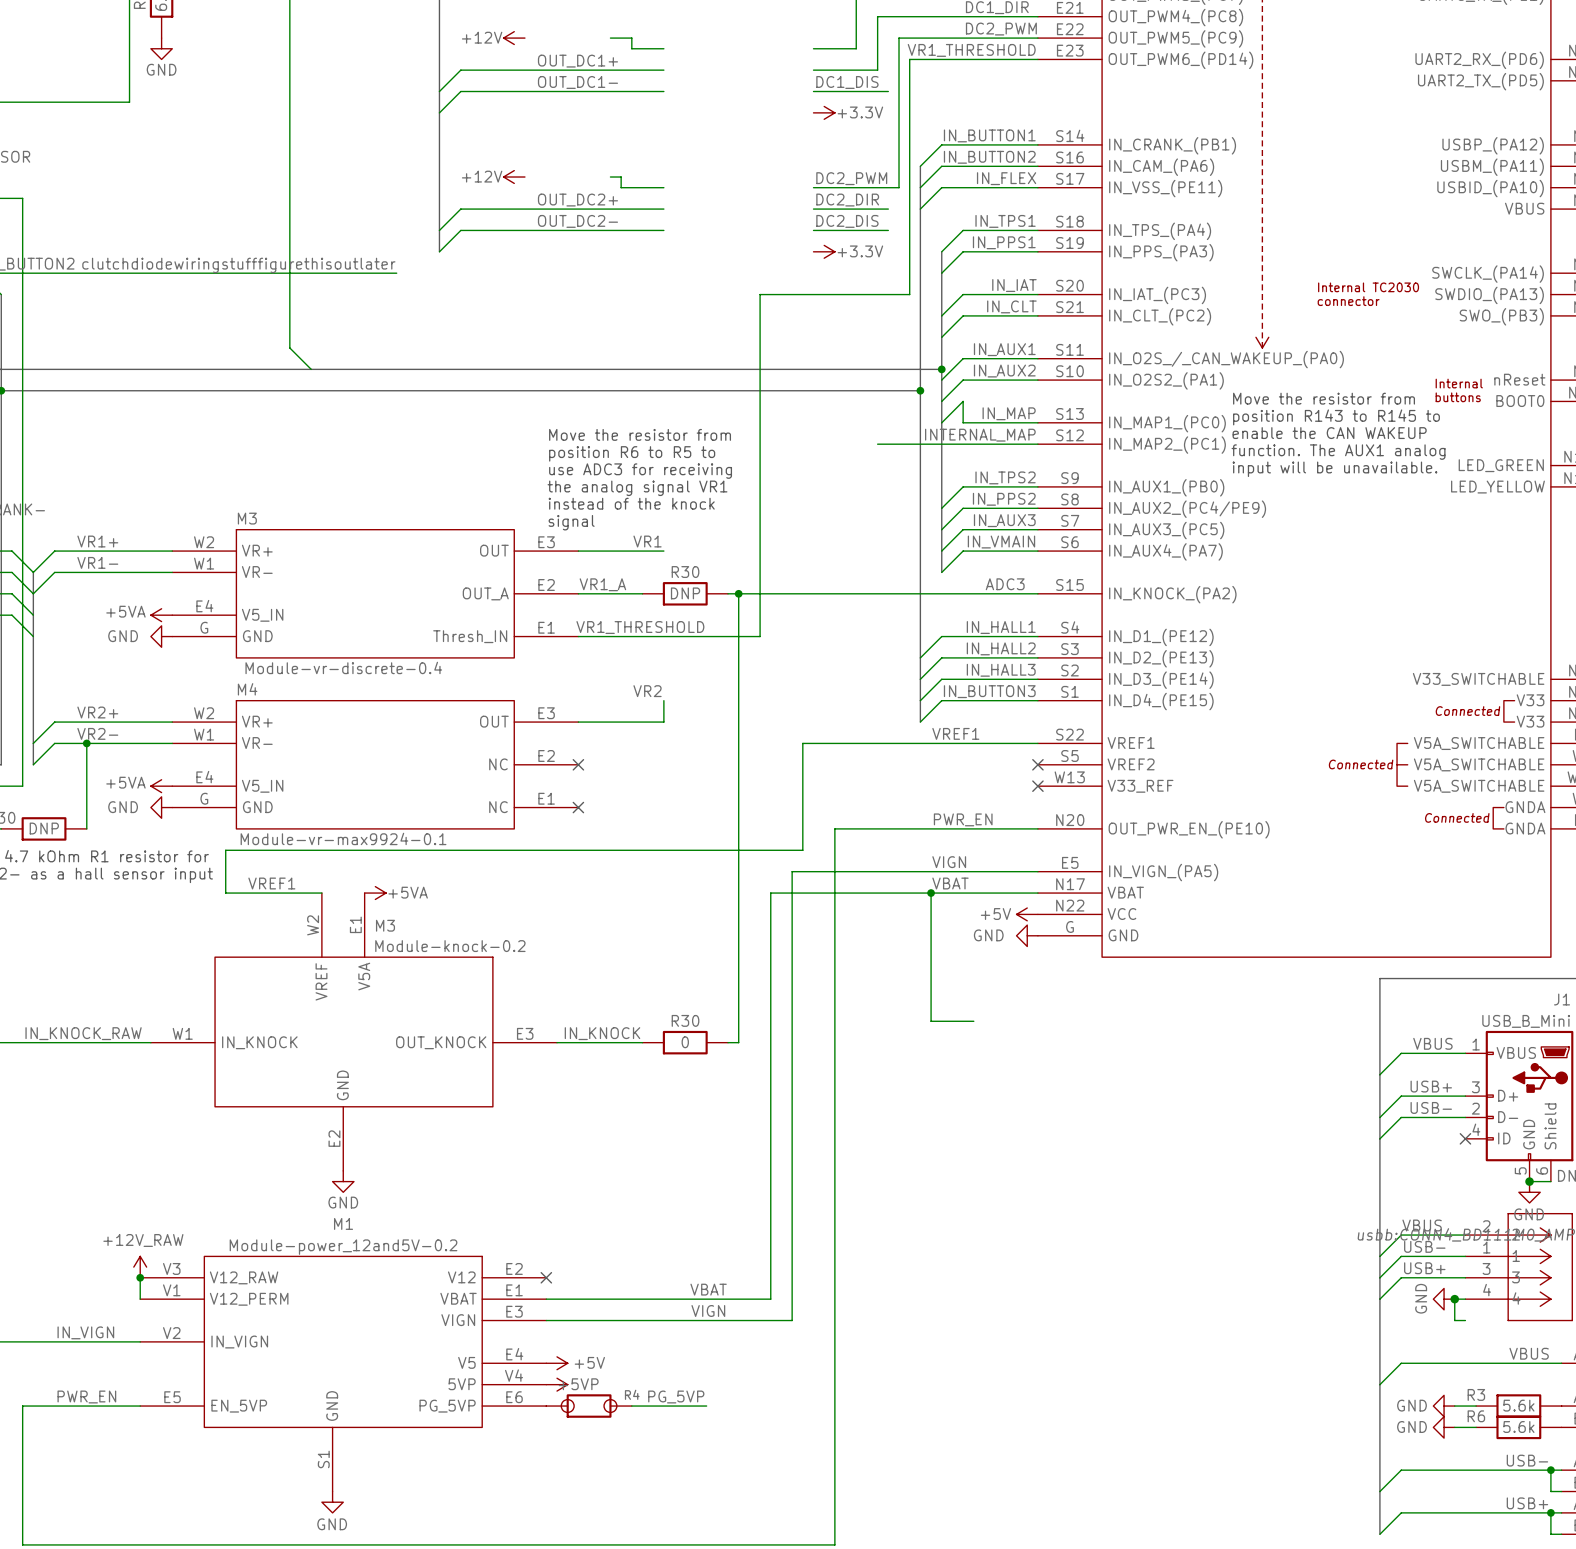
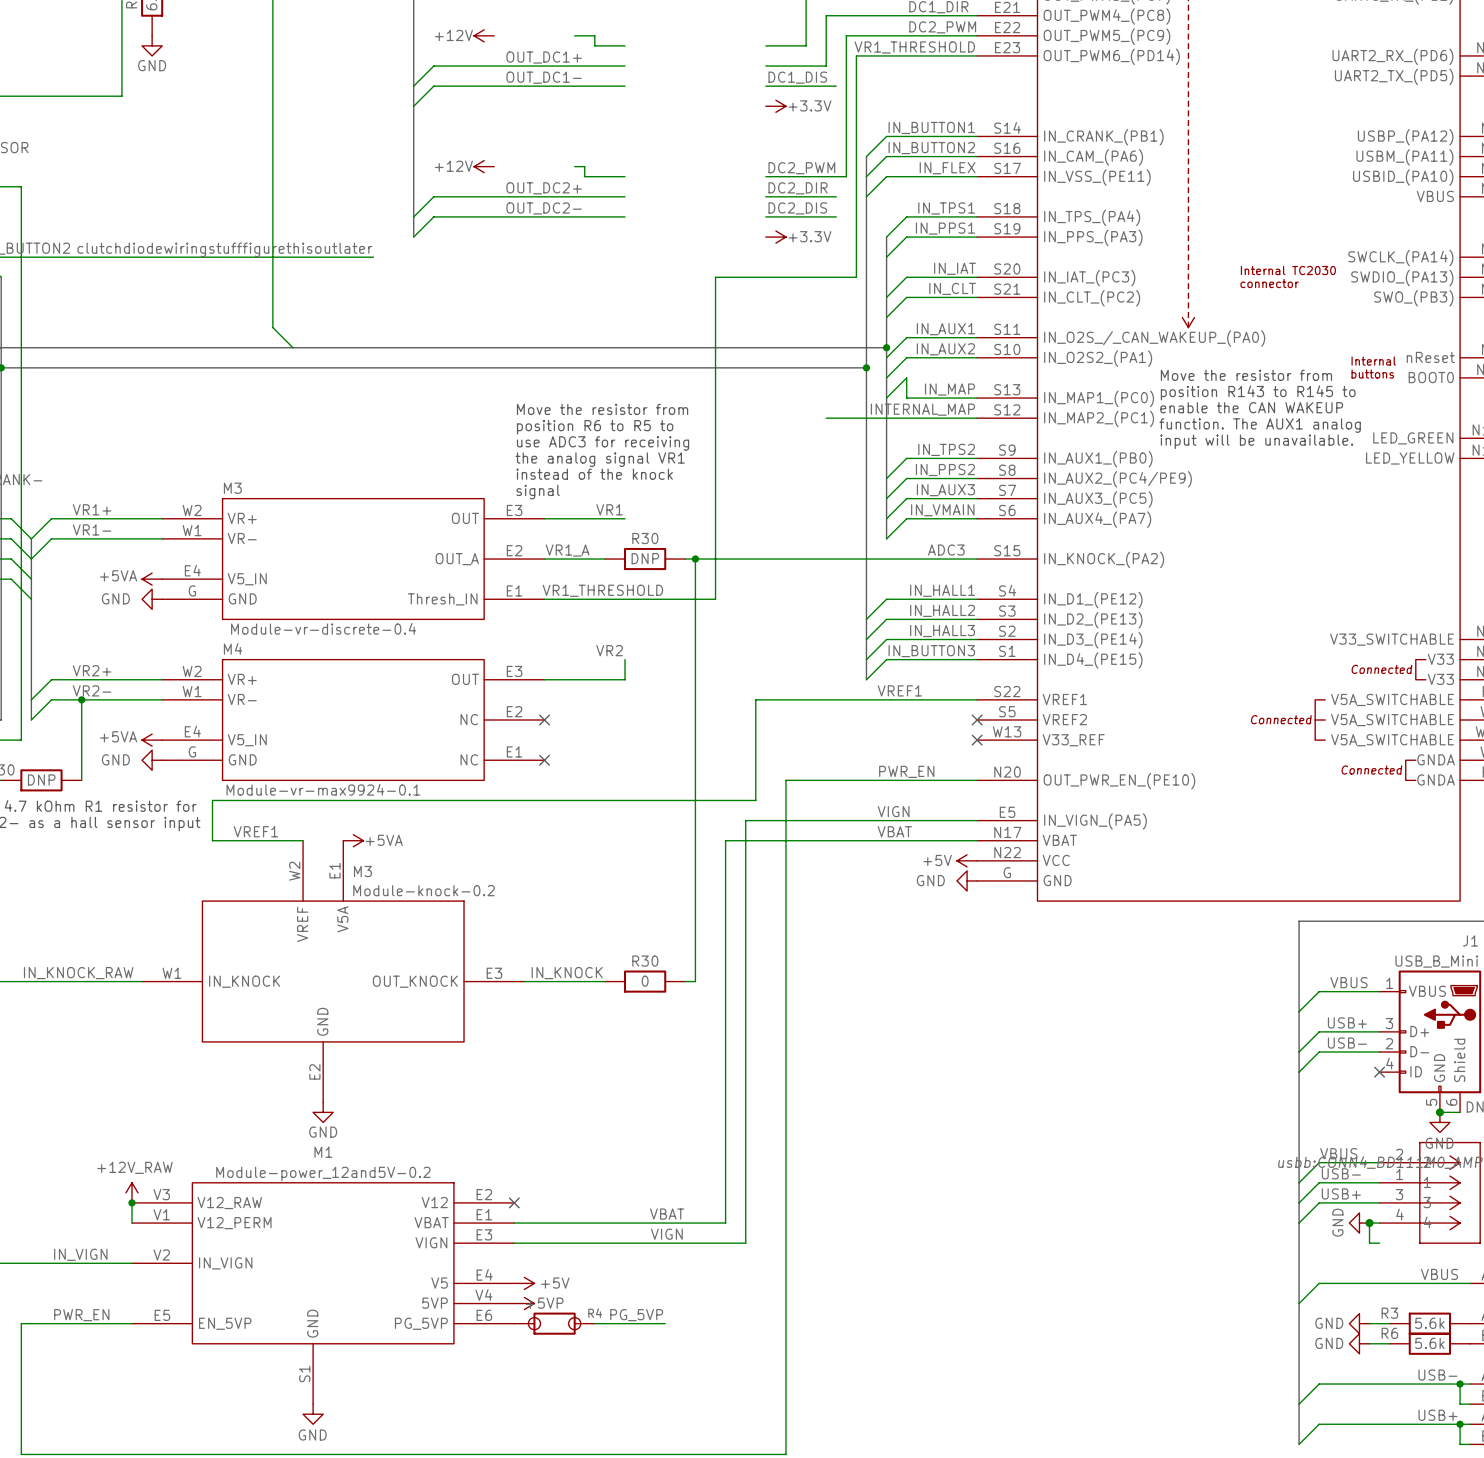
wire: (931, 893) (931, 1021) (973, 1021) -> none
junction: (931, 893) -> none

